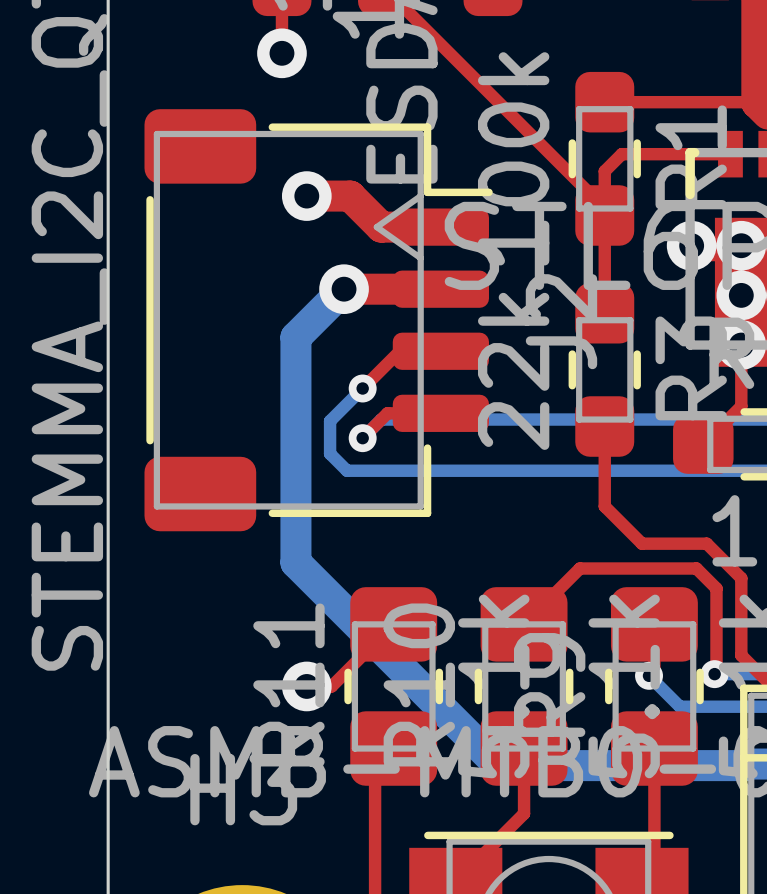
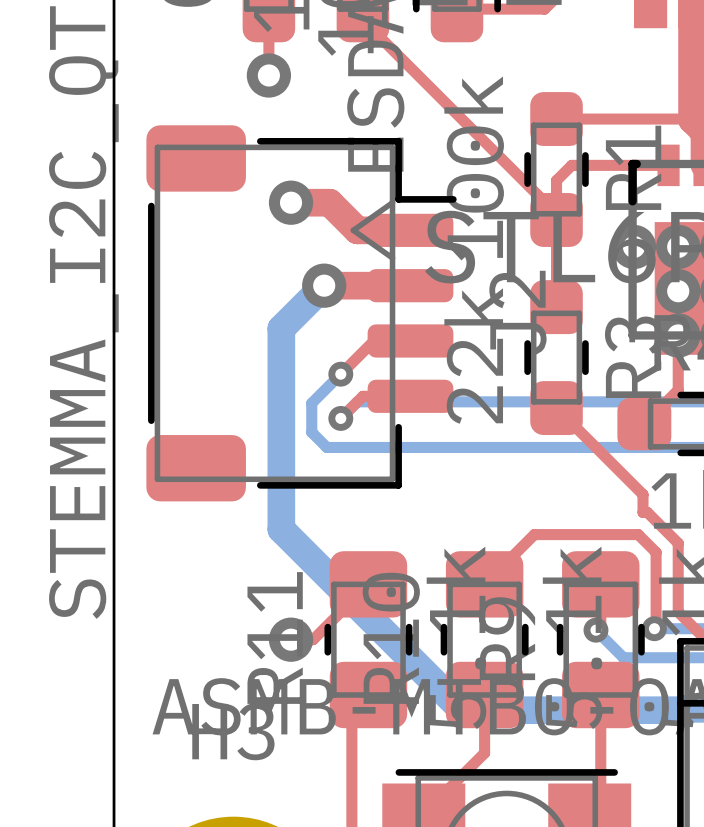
top track: (604, 426) (604, 506) (642, 543) (701, 543) -> (556, 408) (643, 494) (643, 512)

